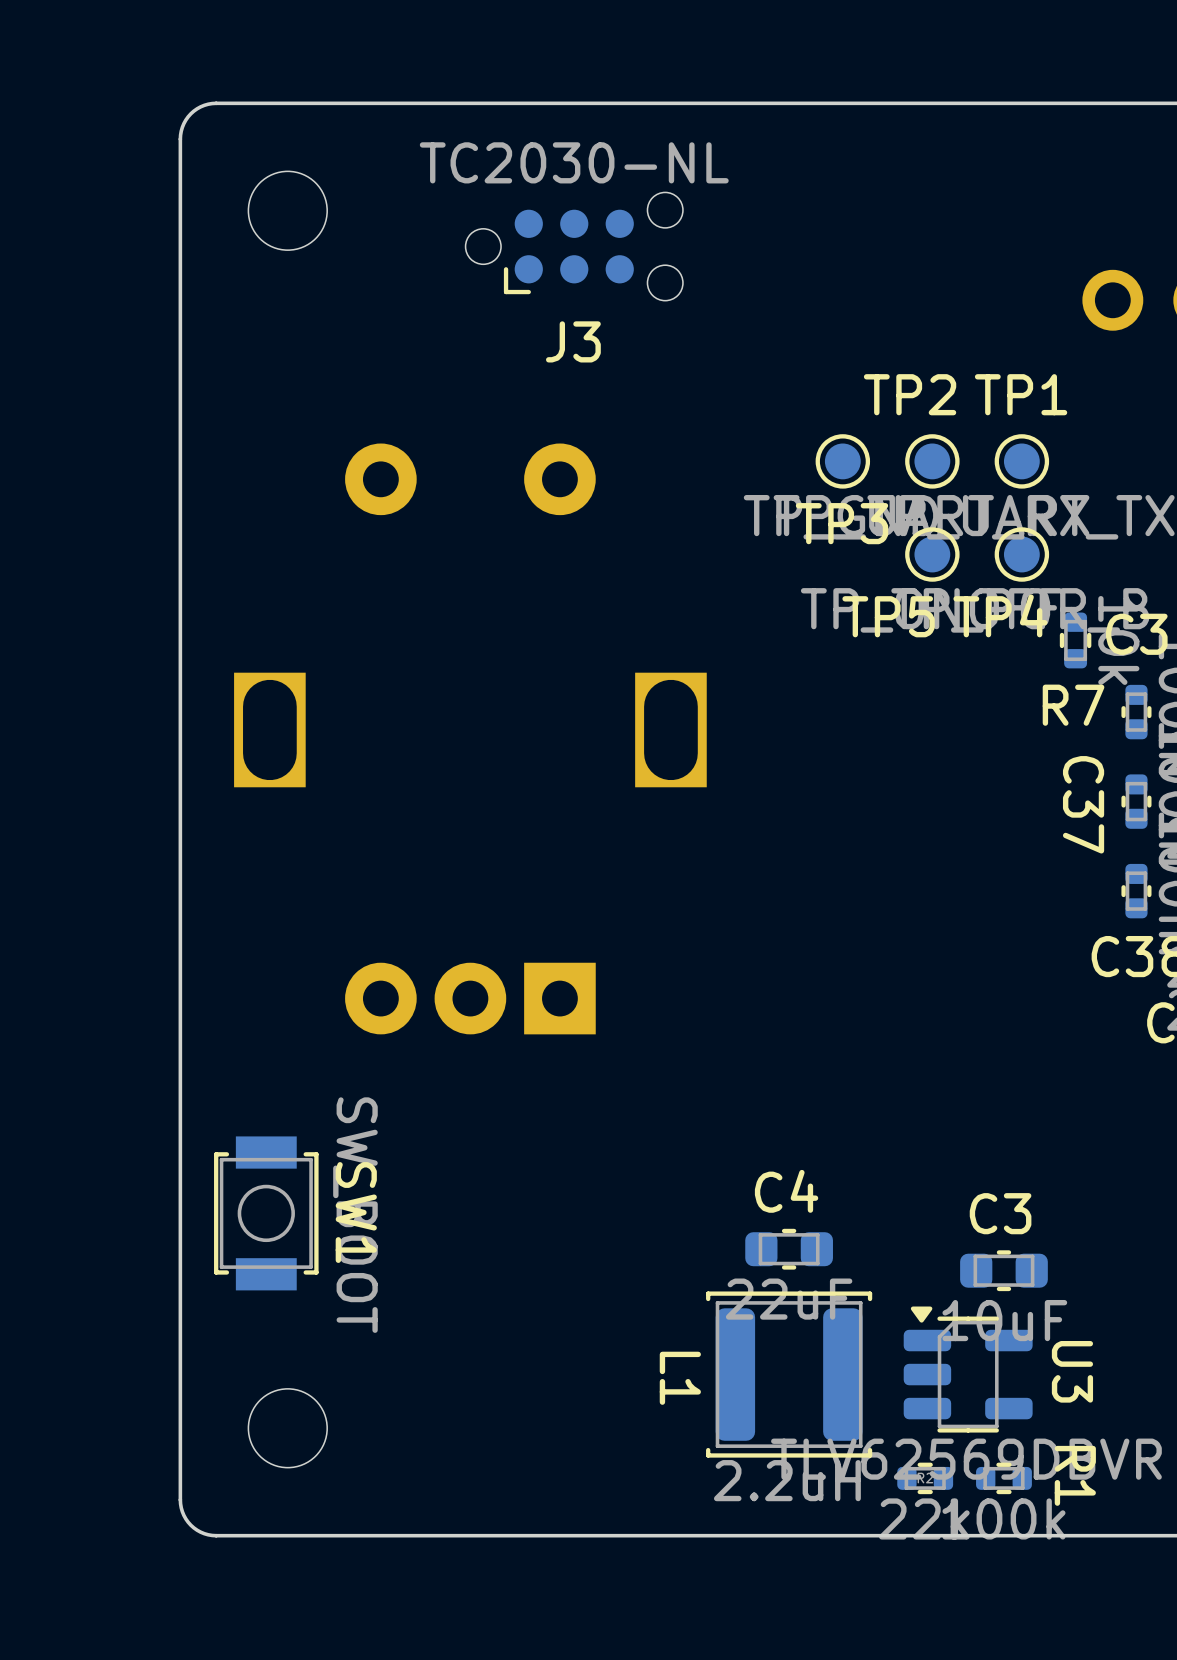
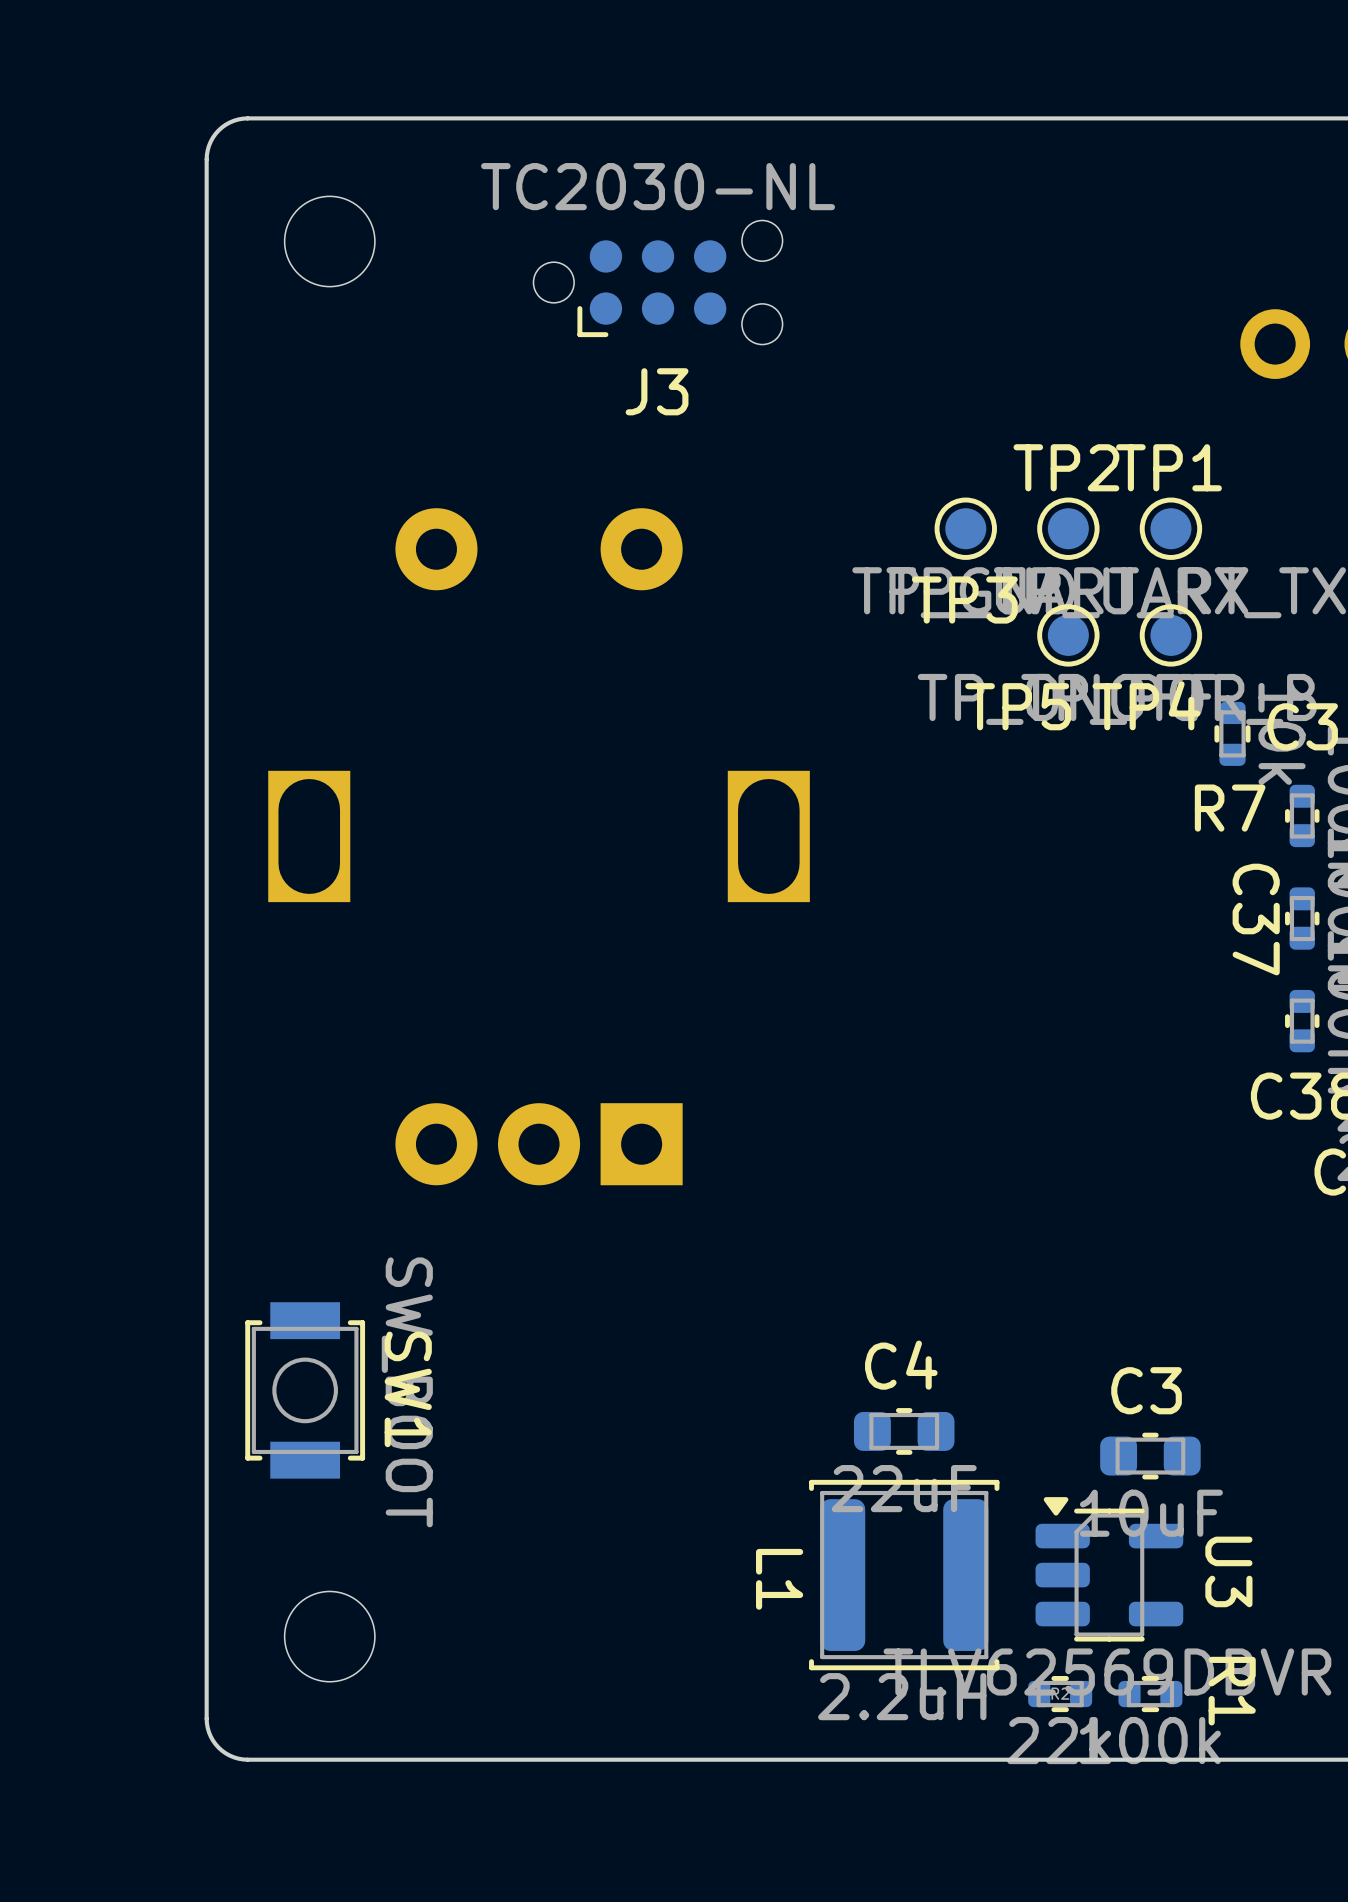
TP2 name position: TP2 (910, 394) -> TP2 (1066, 467)
TP1 name position: TP1 (1021, 394) -> TP1 (1168, 467)
C37 name position: C37 (1083, 804) -> C37 (1256, 919)

